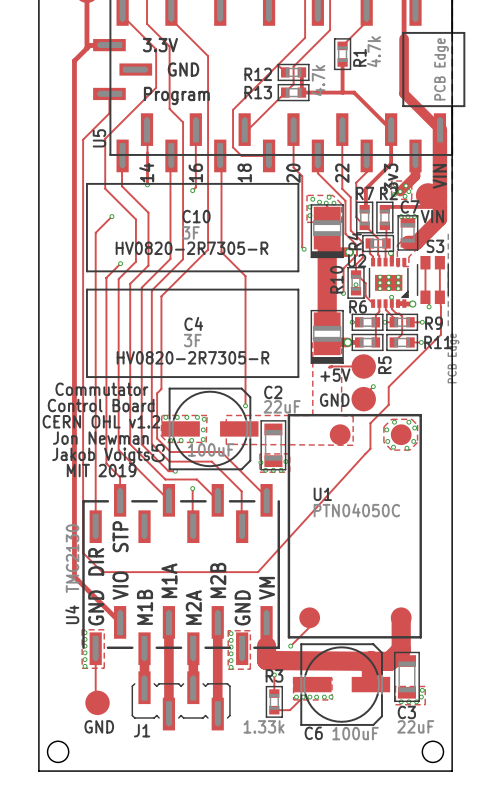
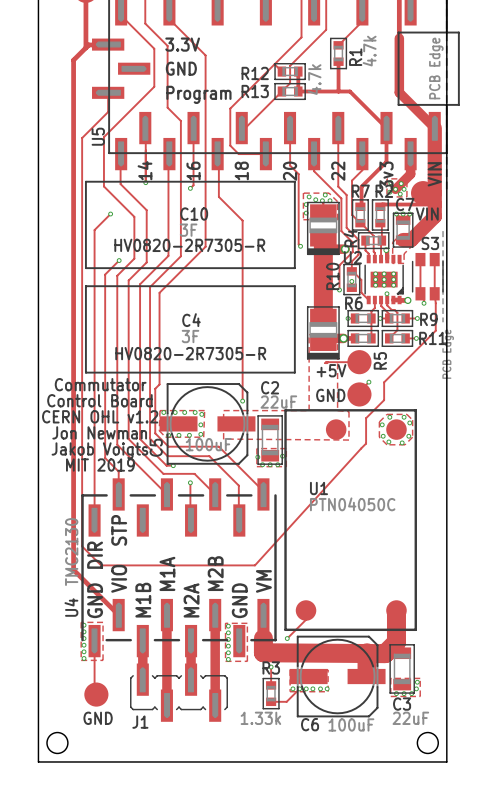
U5 text position: 3.3V (160, 45) -> 3.3V (182, 44)
U5 text position: Program (176, 95) -> Program (198, 94)
track: (221, 199) (221, 252) (245, 276) -> (218, 196) (242, 220) (242, 272)

